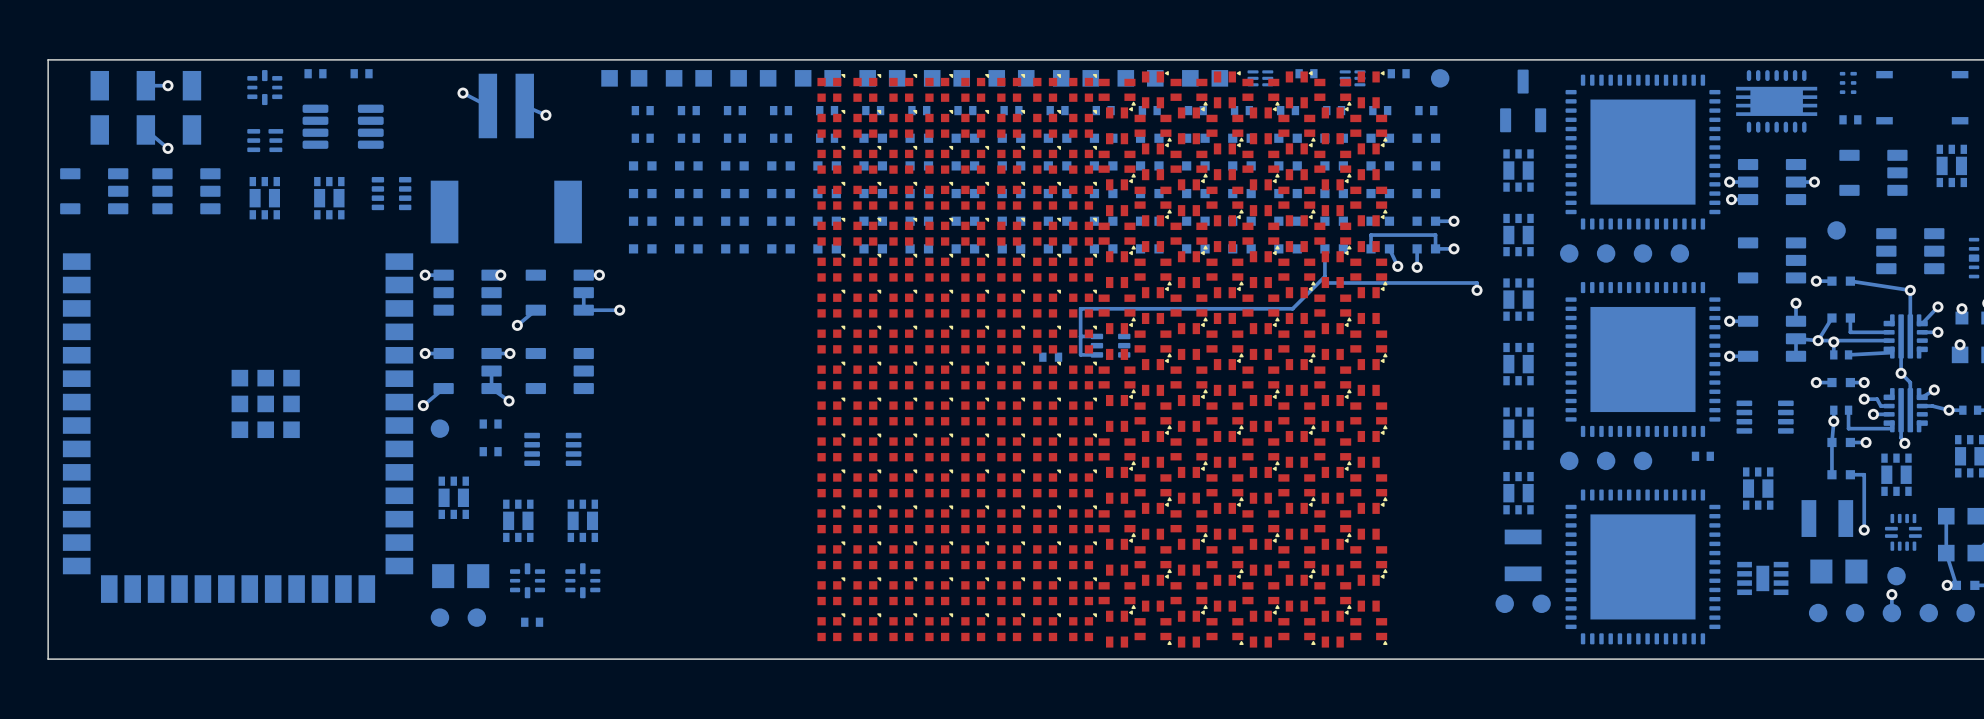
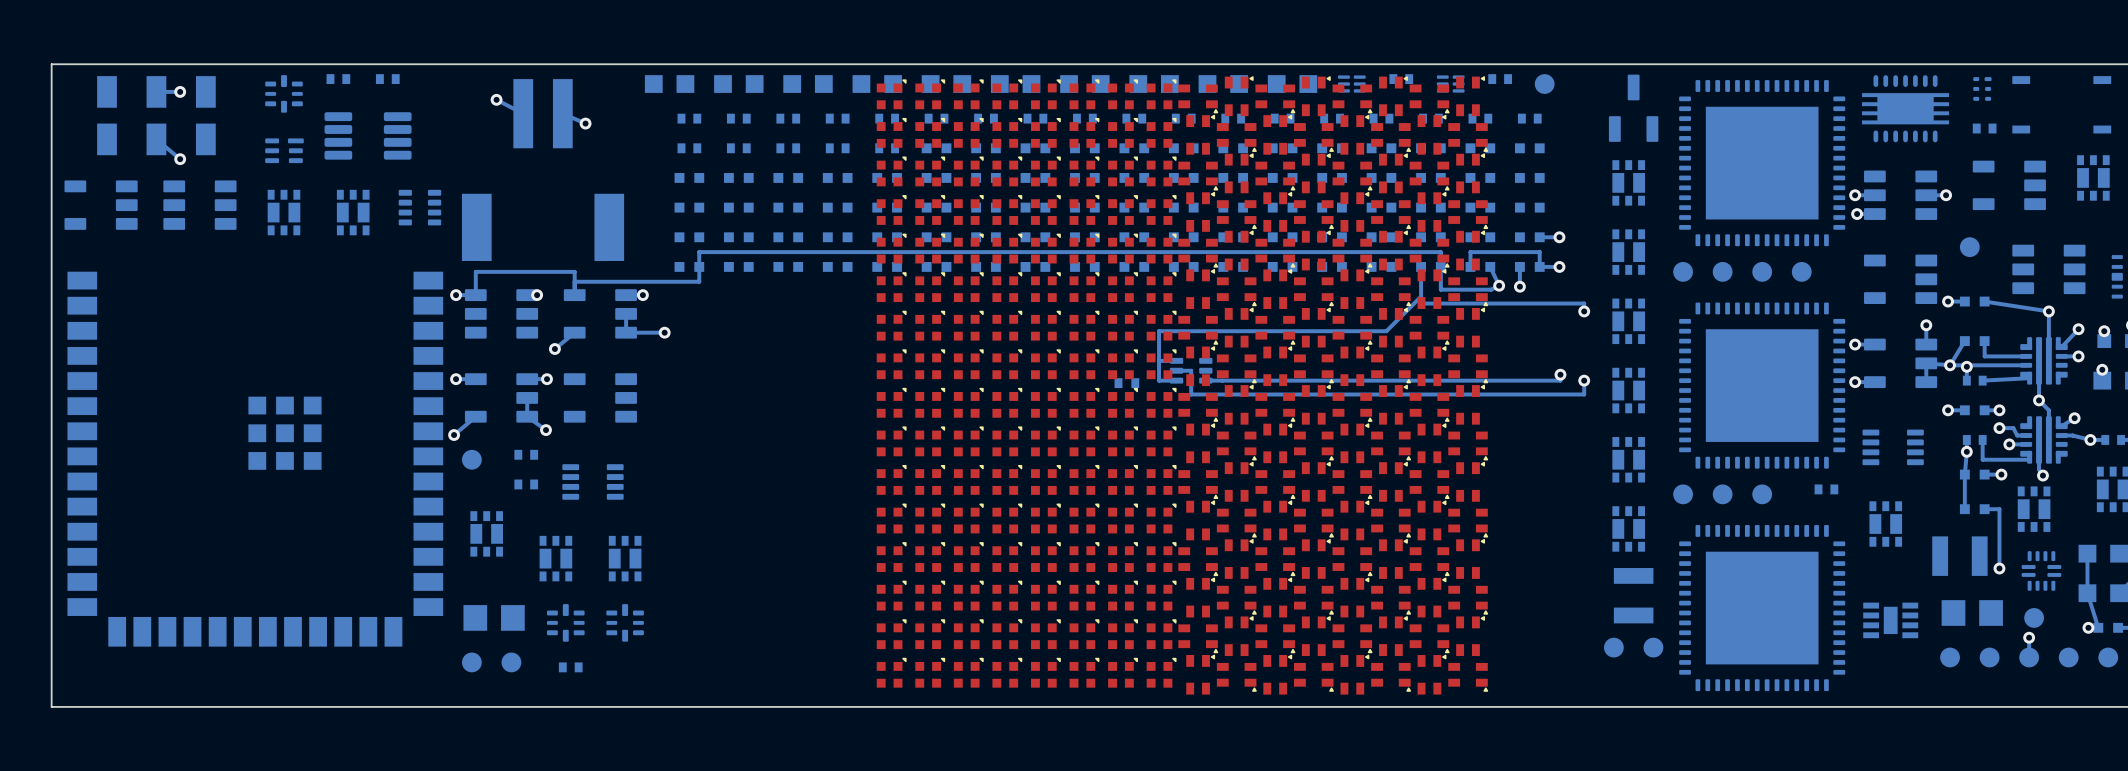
bottom track: none -> (574, 281) (699, 281) (699, 252) (1440, 252) (1440, 289) (1491, 289) (1499, 285)
bottom track: none -> (475, 295) (475, 271) (574, 271) (574, 295)
bottom track: none -> (1176, 370) (1191, 370) (1191, 394) (1584, 394) (1584, 380)
bottom track: none -> (1560, 374) (1560, 380) (1205, 380)
via: none -> (1560, 374)
via: none -> (1584, 380)

